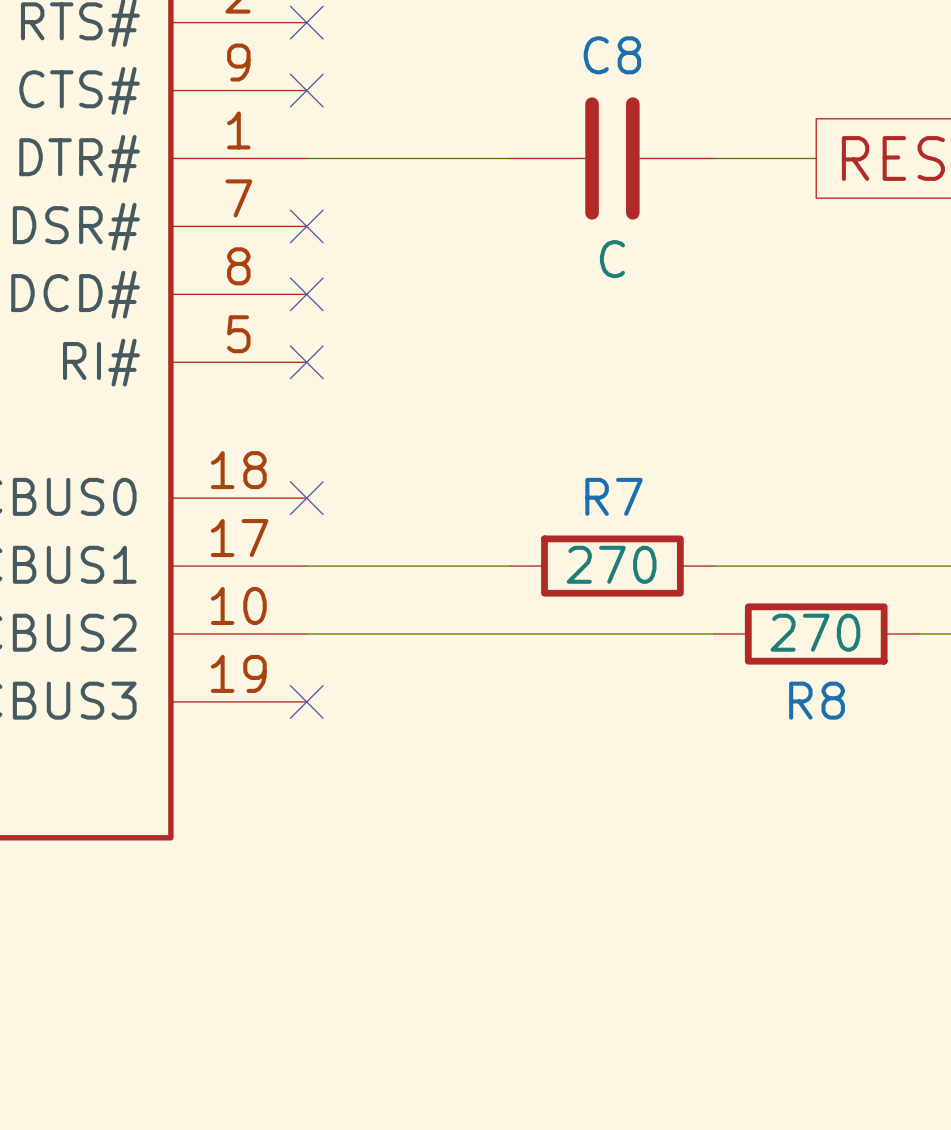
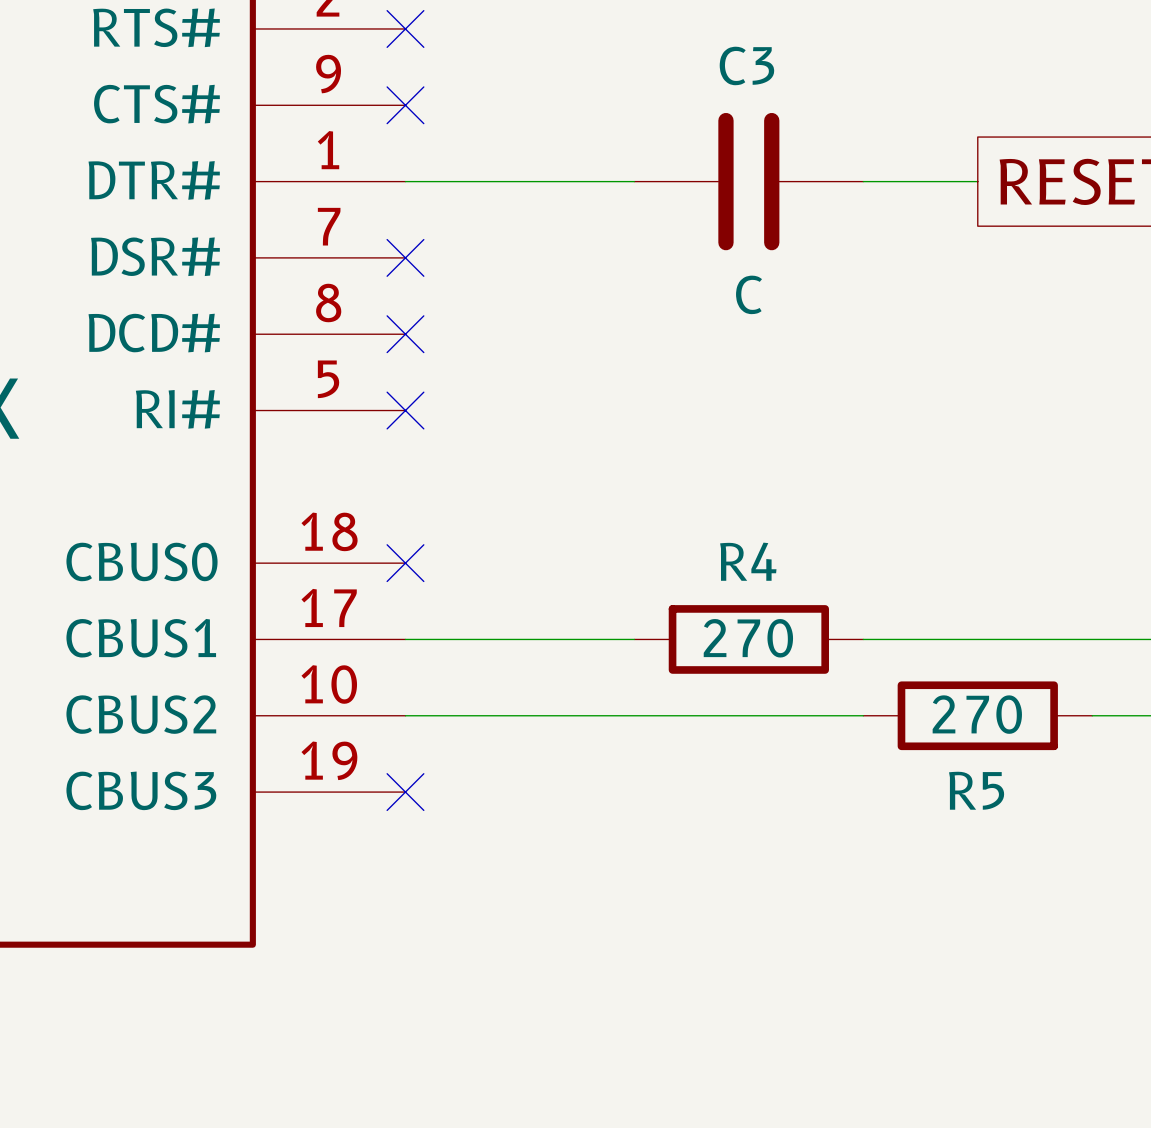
C8 name: C8 (612, 55) -> C3 (746, 65)
R7 name: R7 (614, 496) -> R4 (748, 561)
R8 name: R8 (817, 700) -> R5 (976, 790)

